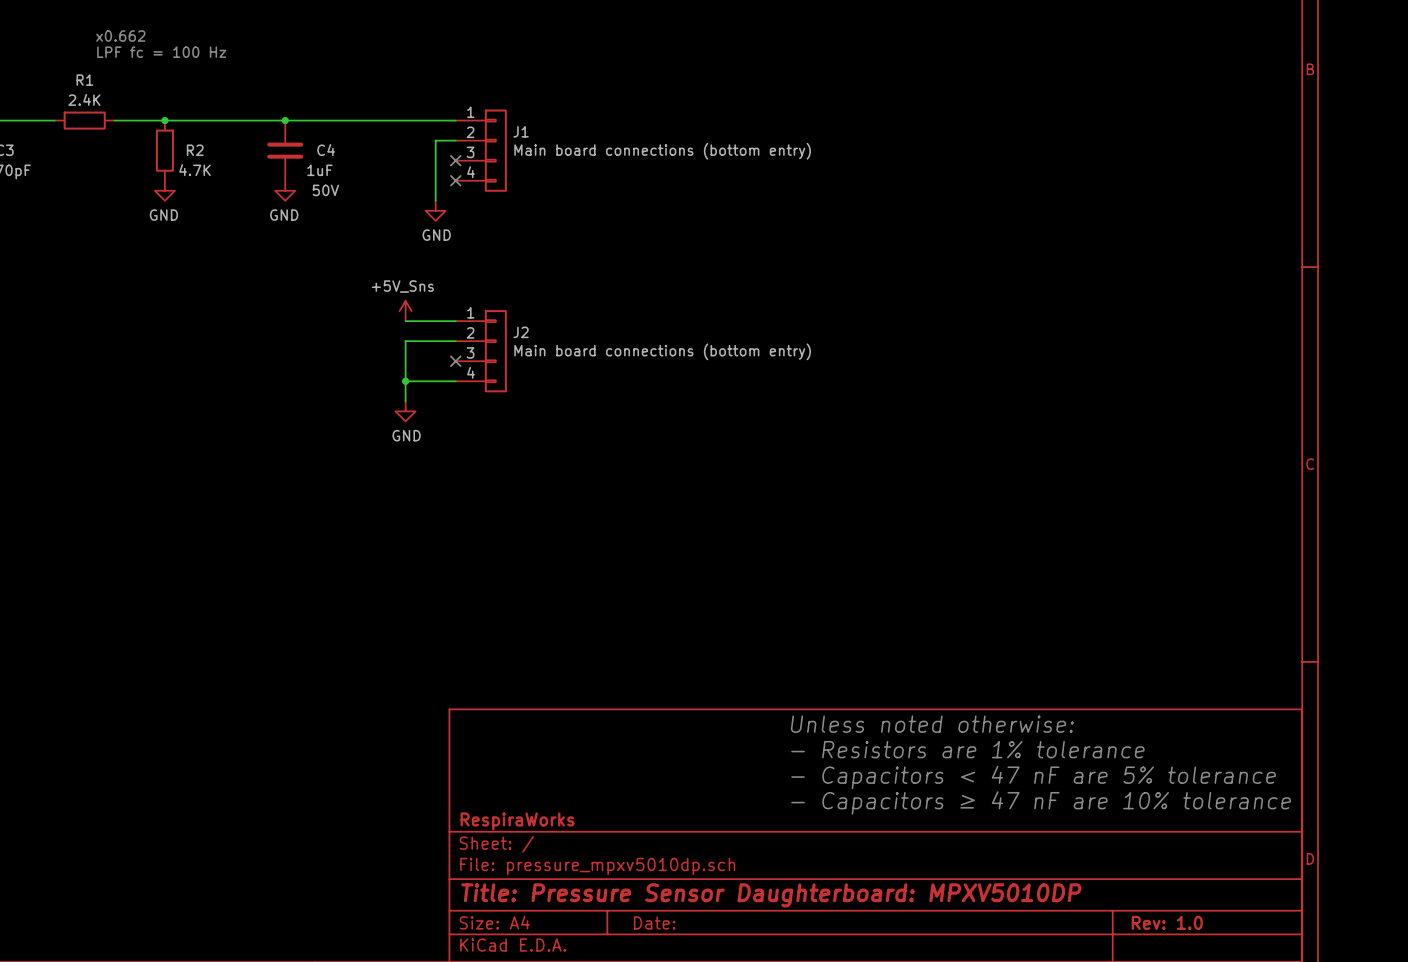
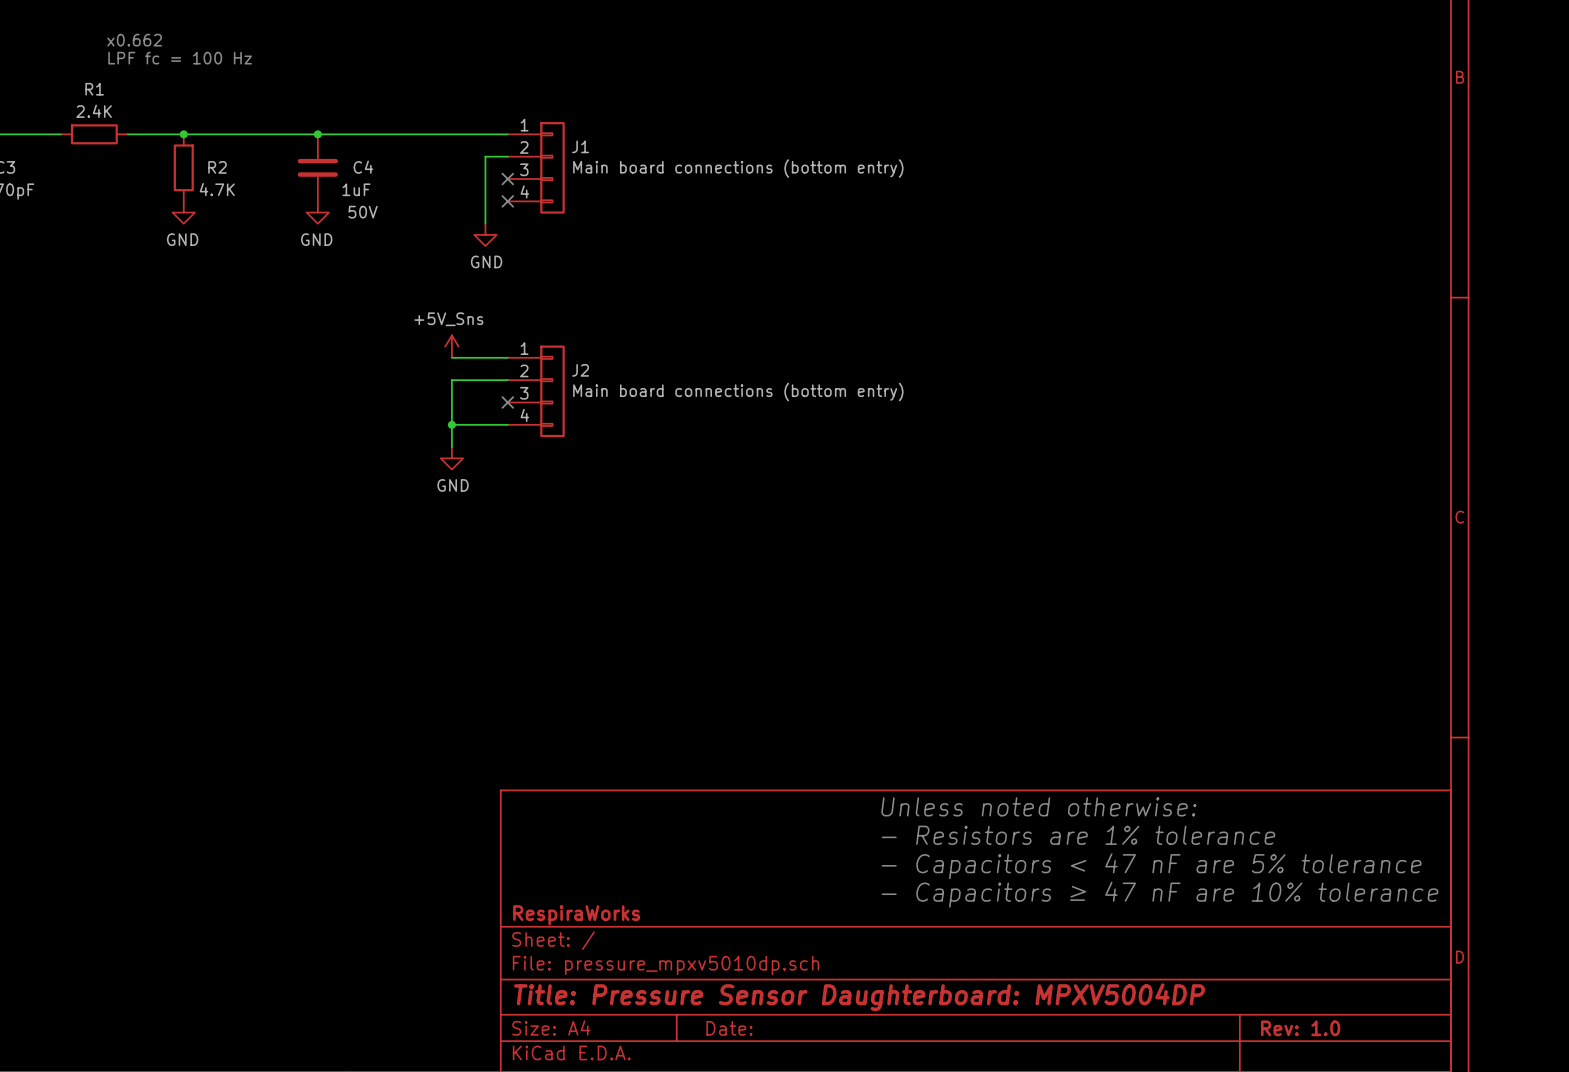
title block: Title: Pressure Sensor Daughterboard: MPXV5010DP (771, 895) -> Title: Pressure Sensor Daughterboard: MPXV5004DP (859, 997)

